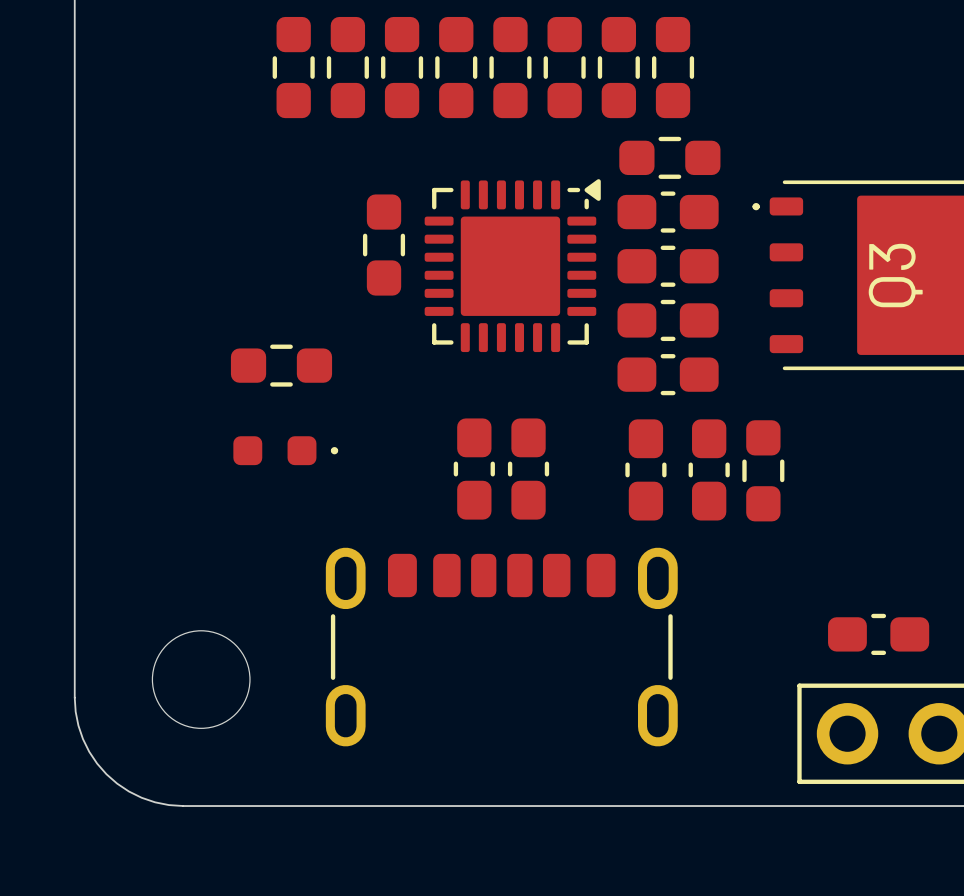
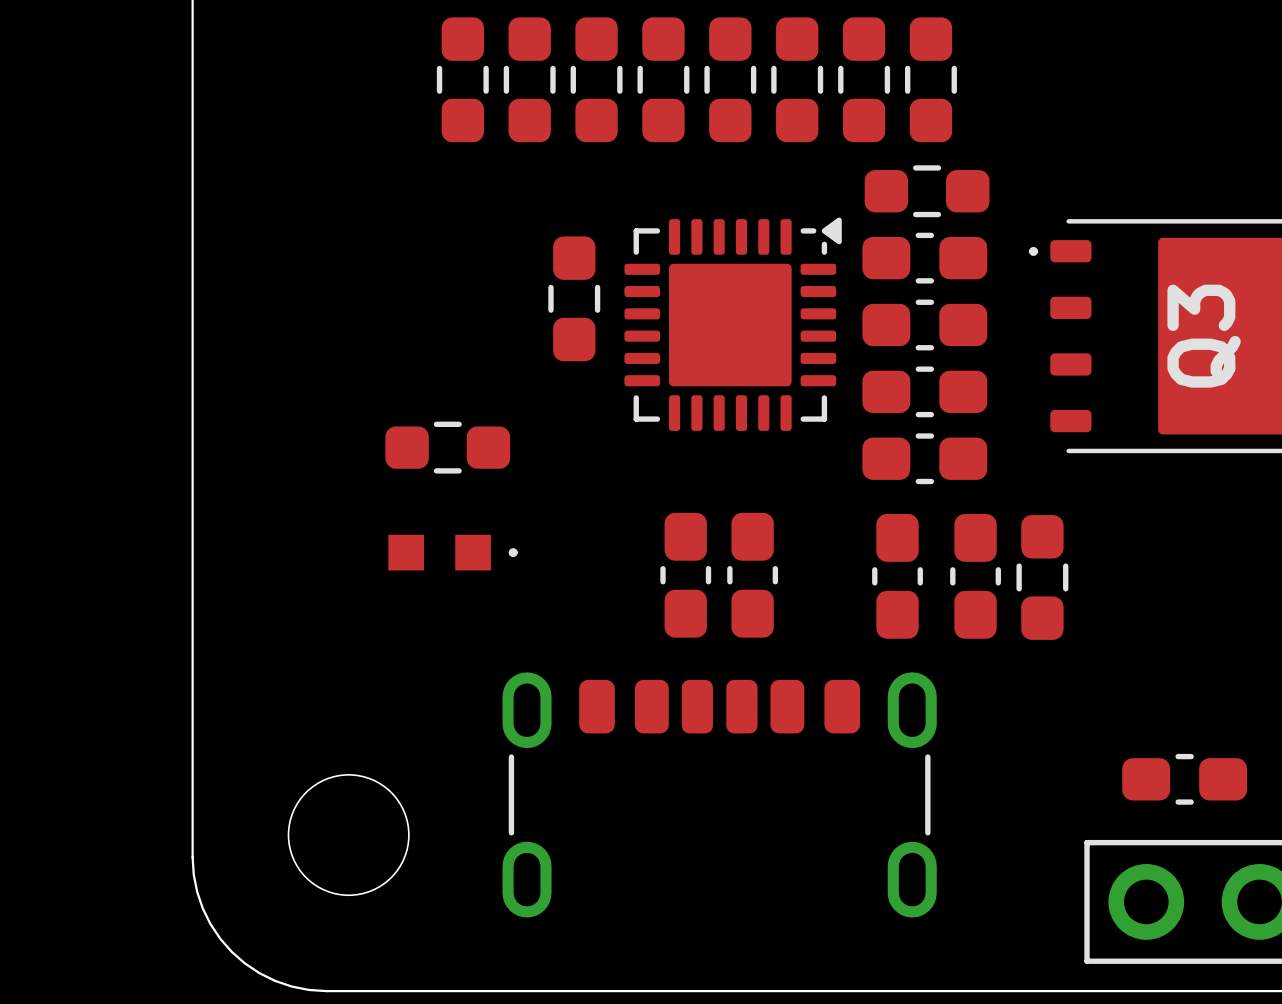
part footprint: [233, 436, 339, 466] -> [388, 534, 518, 571]

